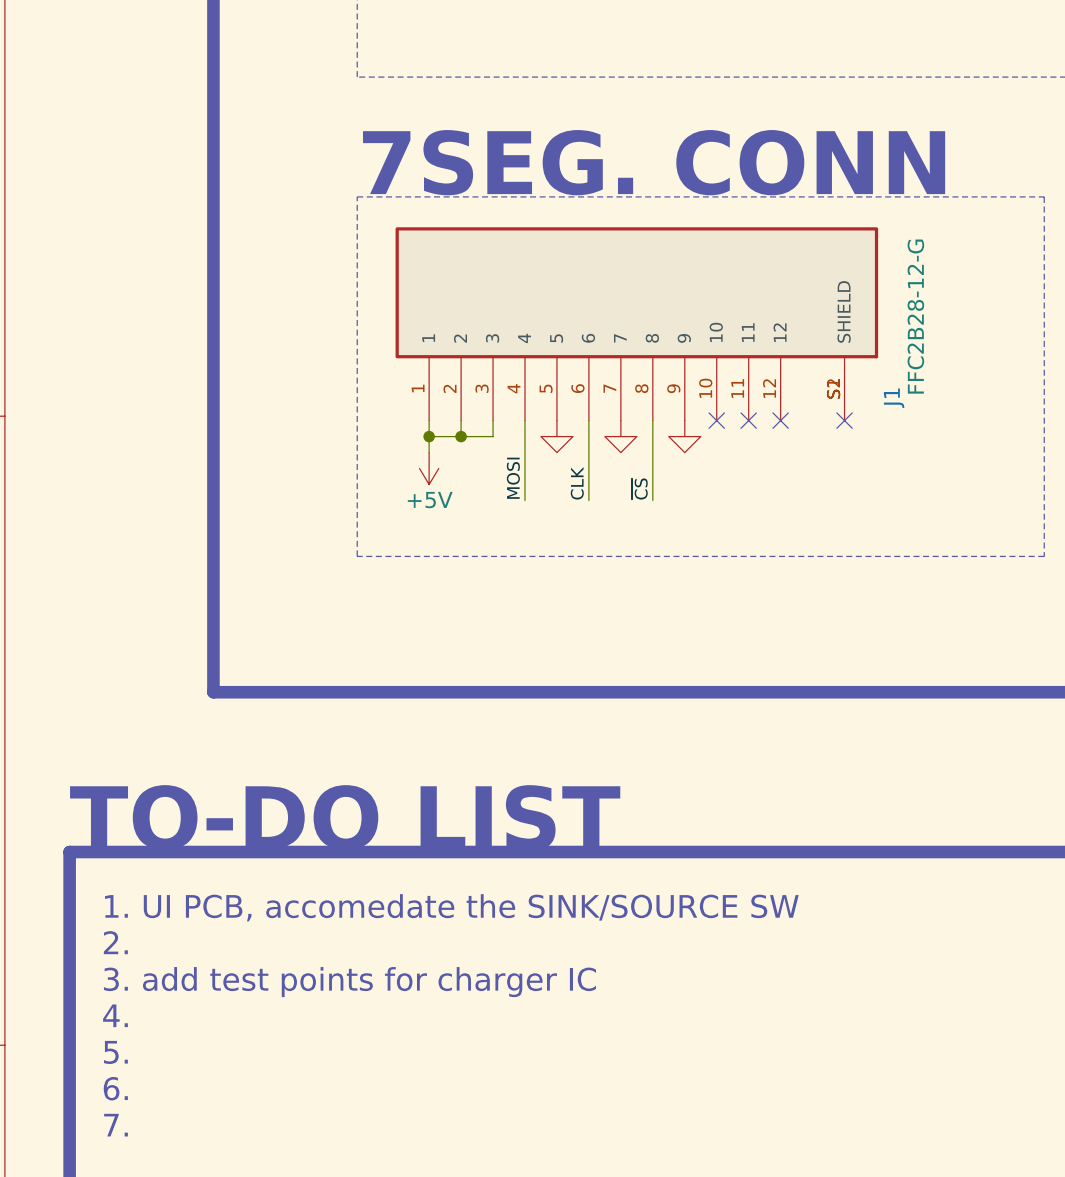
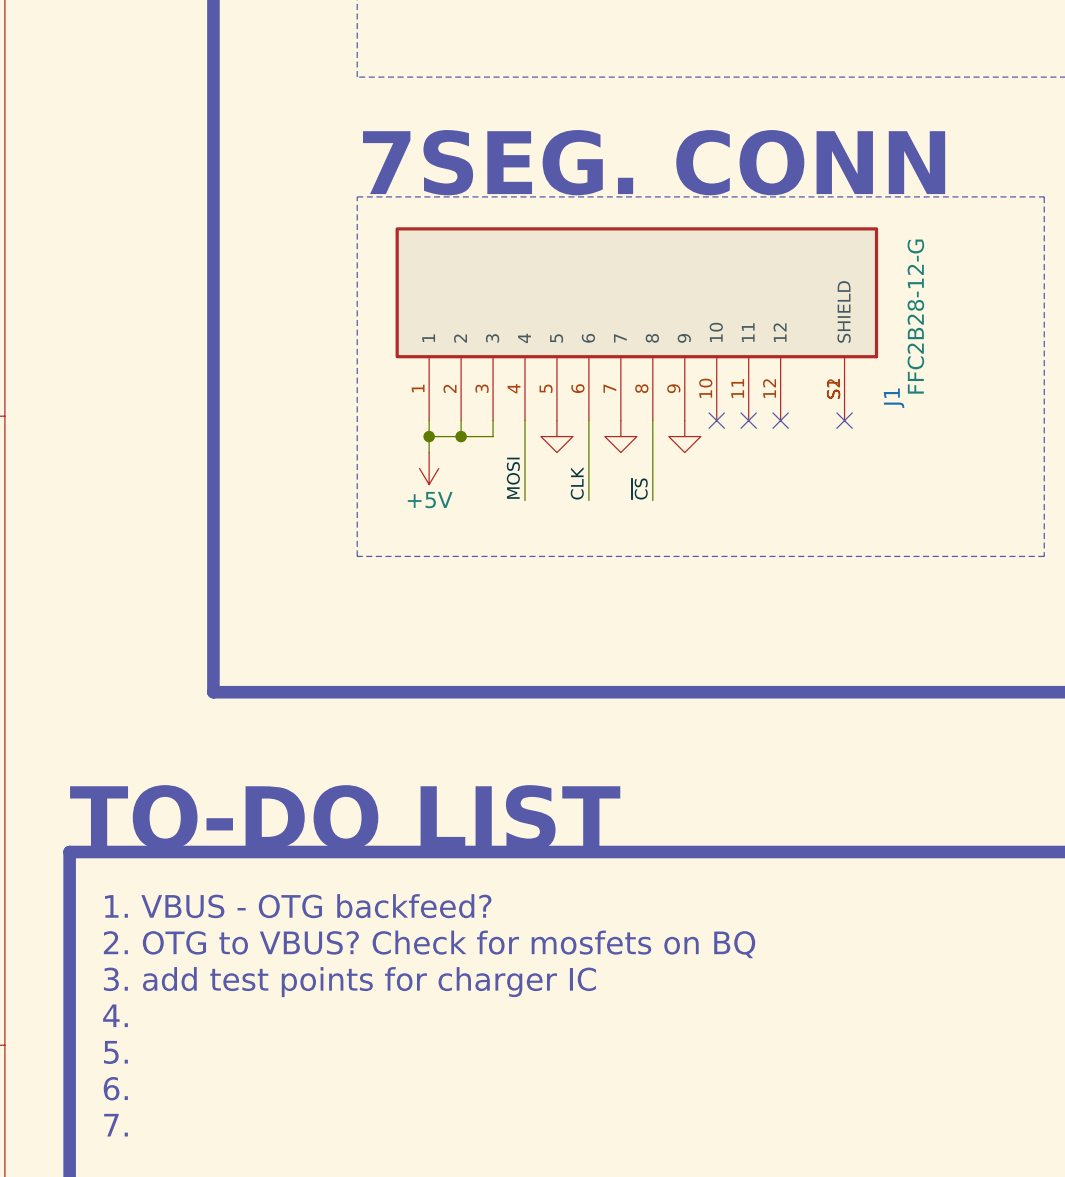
text: 1. UI PCB, accomedate the SINK/SOURCE SW (451, 907) -> 1. VBUS - OTG backfeed? (298, 906)
text: 2. (115, 942) -> 2. OTG to VBUS? Check for mosfets on BQ (429, 944)

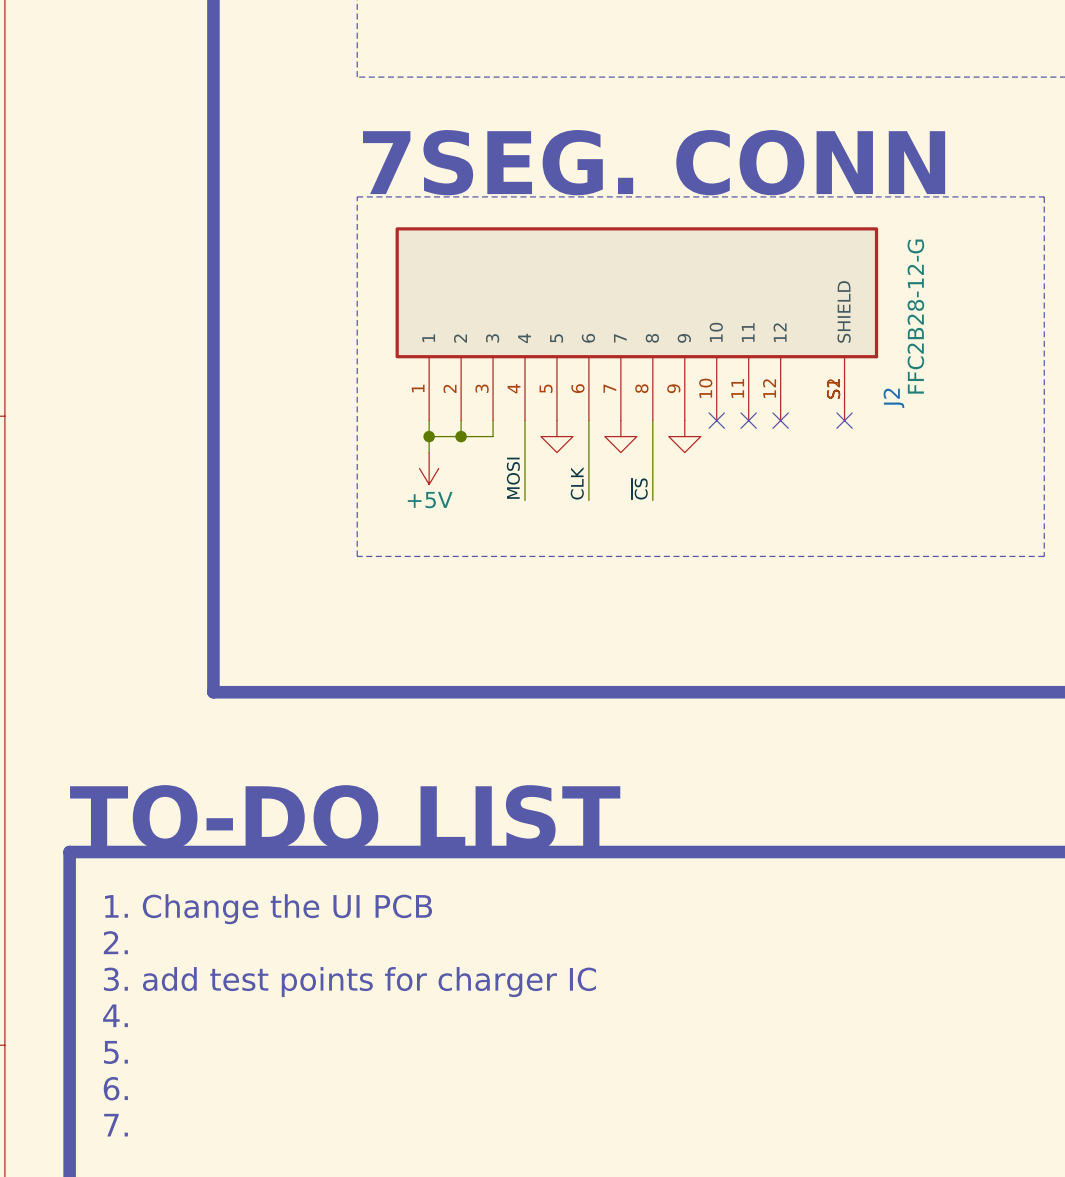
J1 name: J1 (894, 398) -> J2 (893, 398)
text: 1. VBUS - OTG backfeed? (298, 906) -> 1. Change the UI PCB (268, 909)
text: 2. OTG to VBUS? Check for mosfets on BQ (429, 944) -> 2. (115, 942)

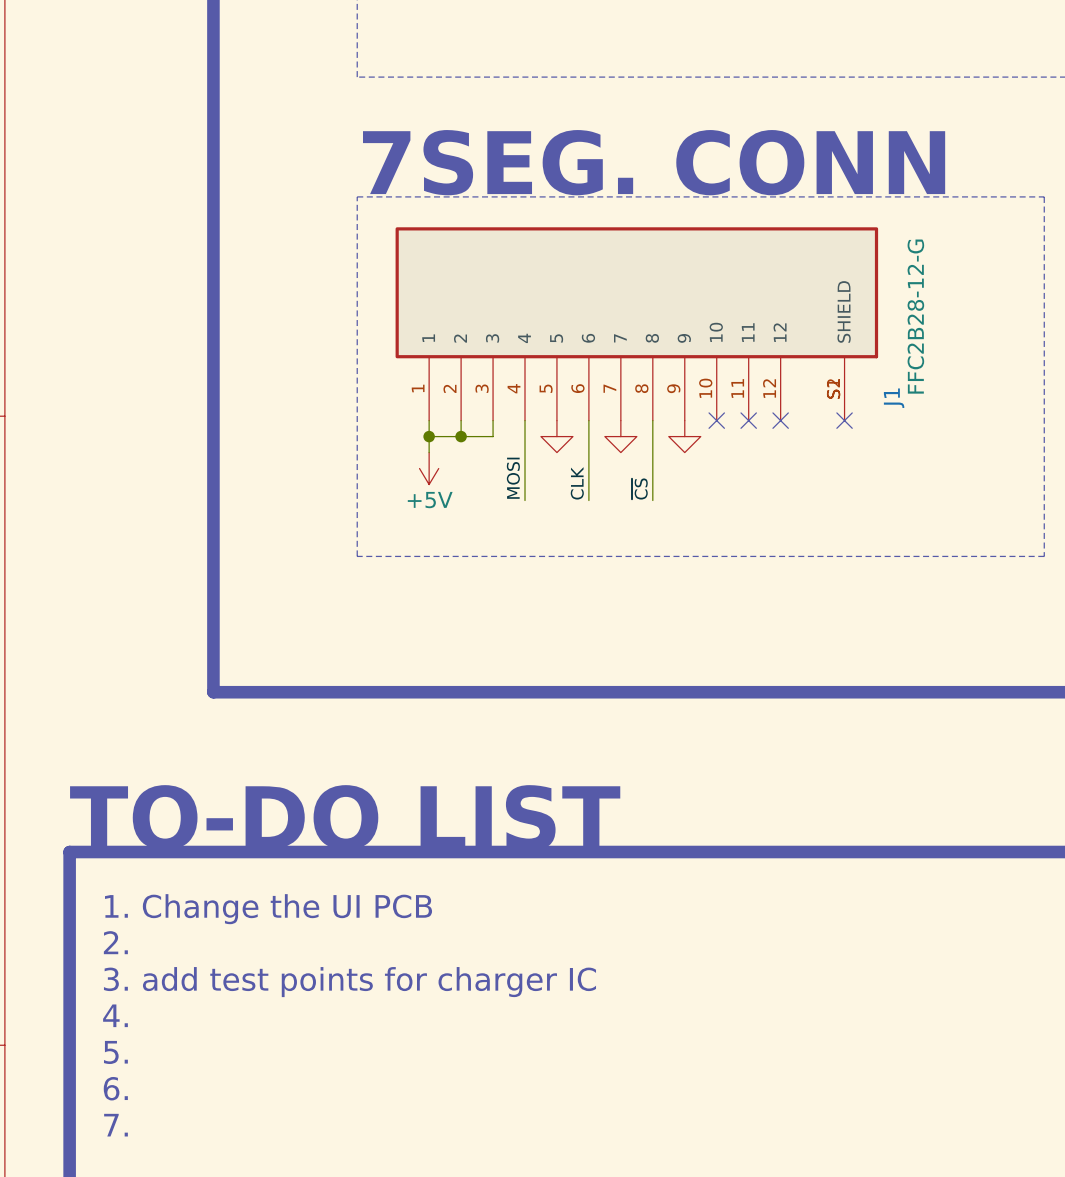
J2 name: J2 (893, 398) -> J1 (894, 398)

